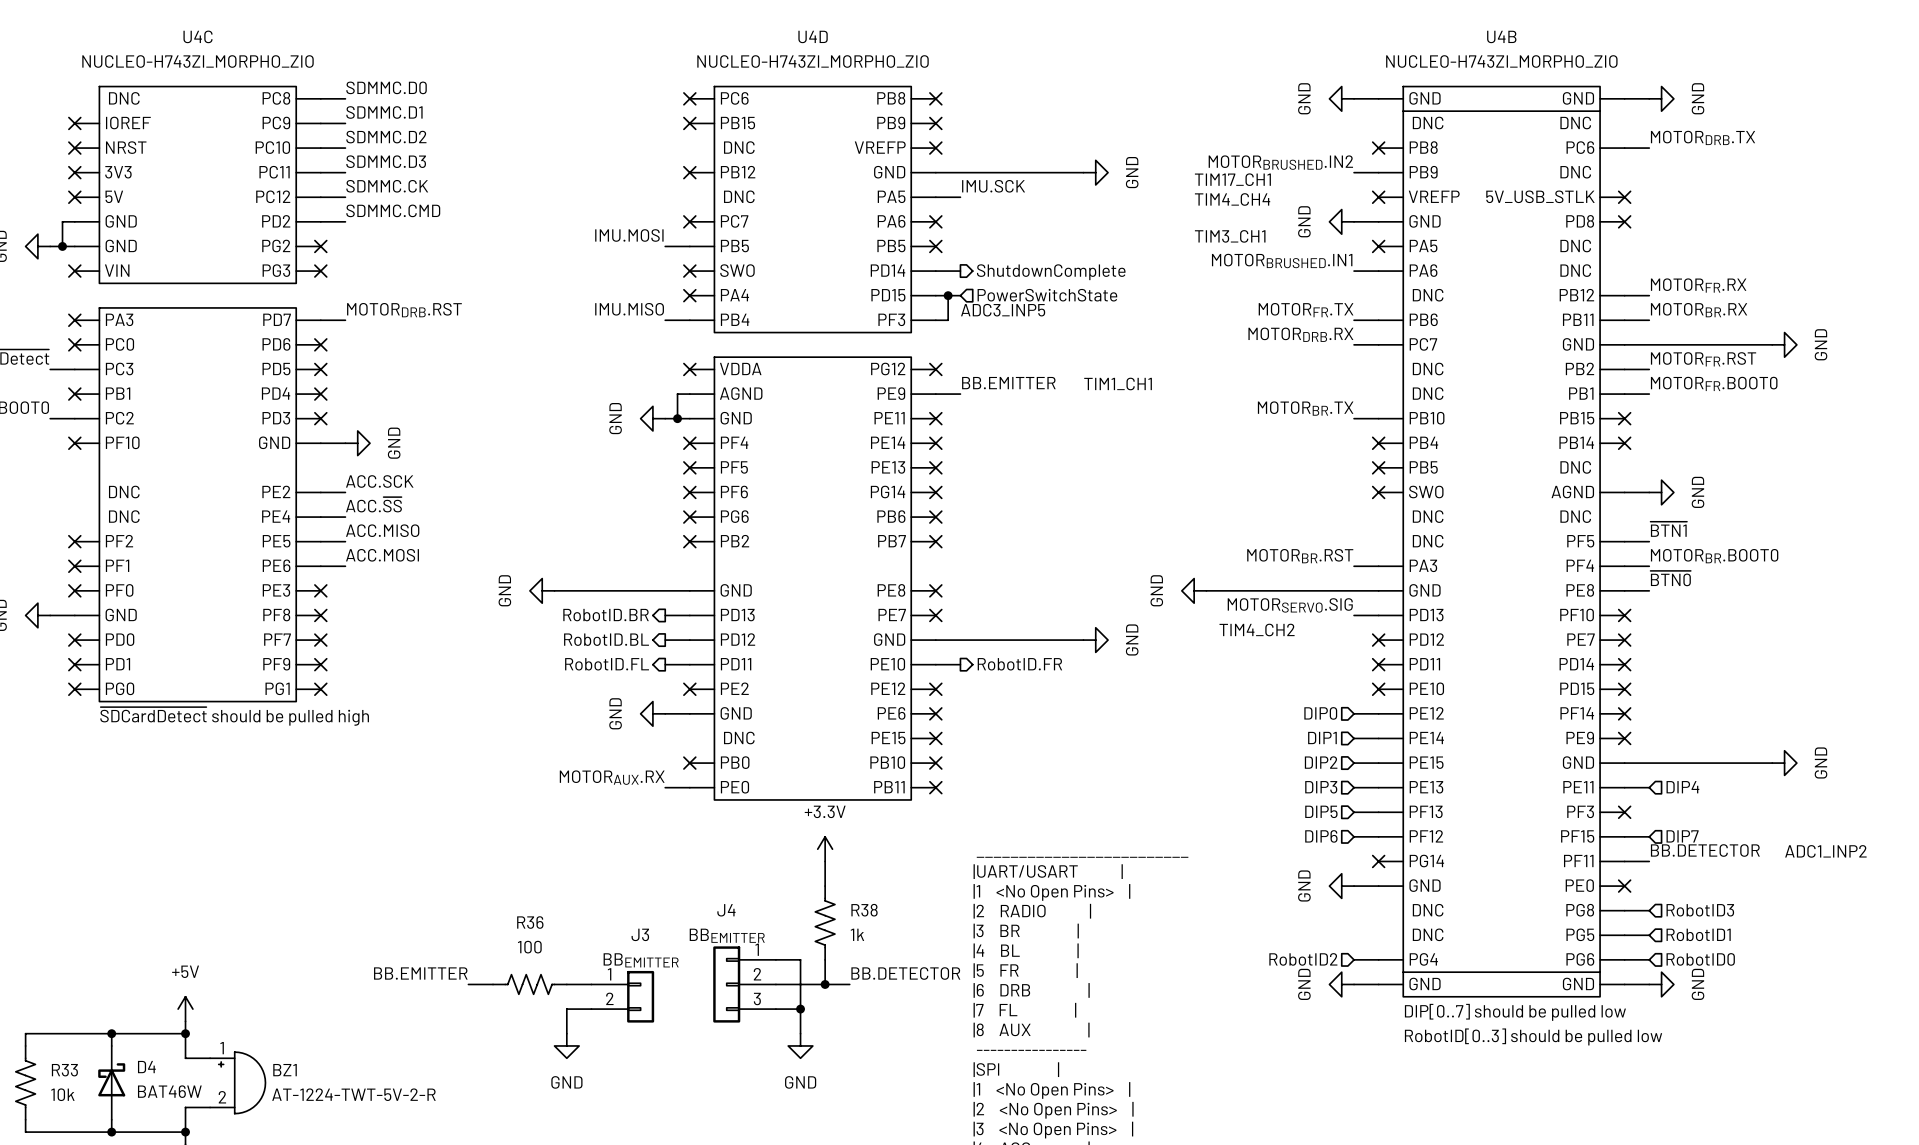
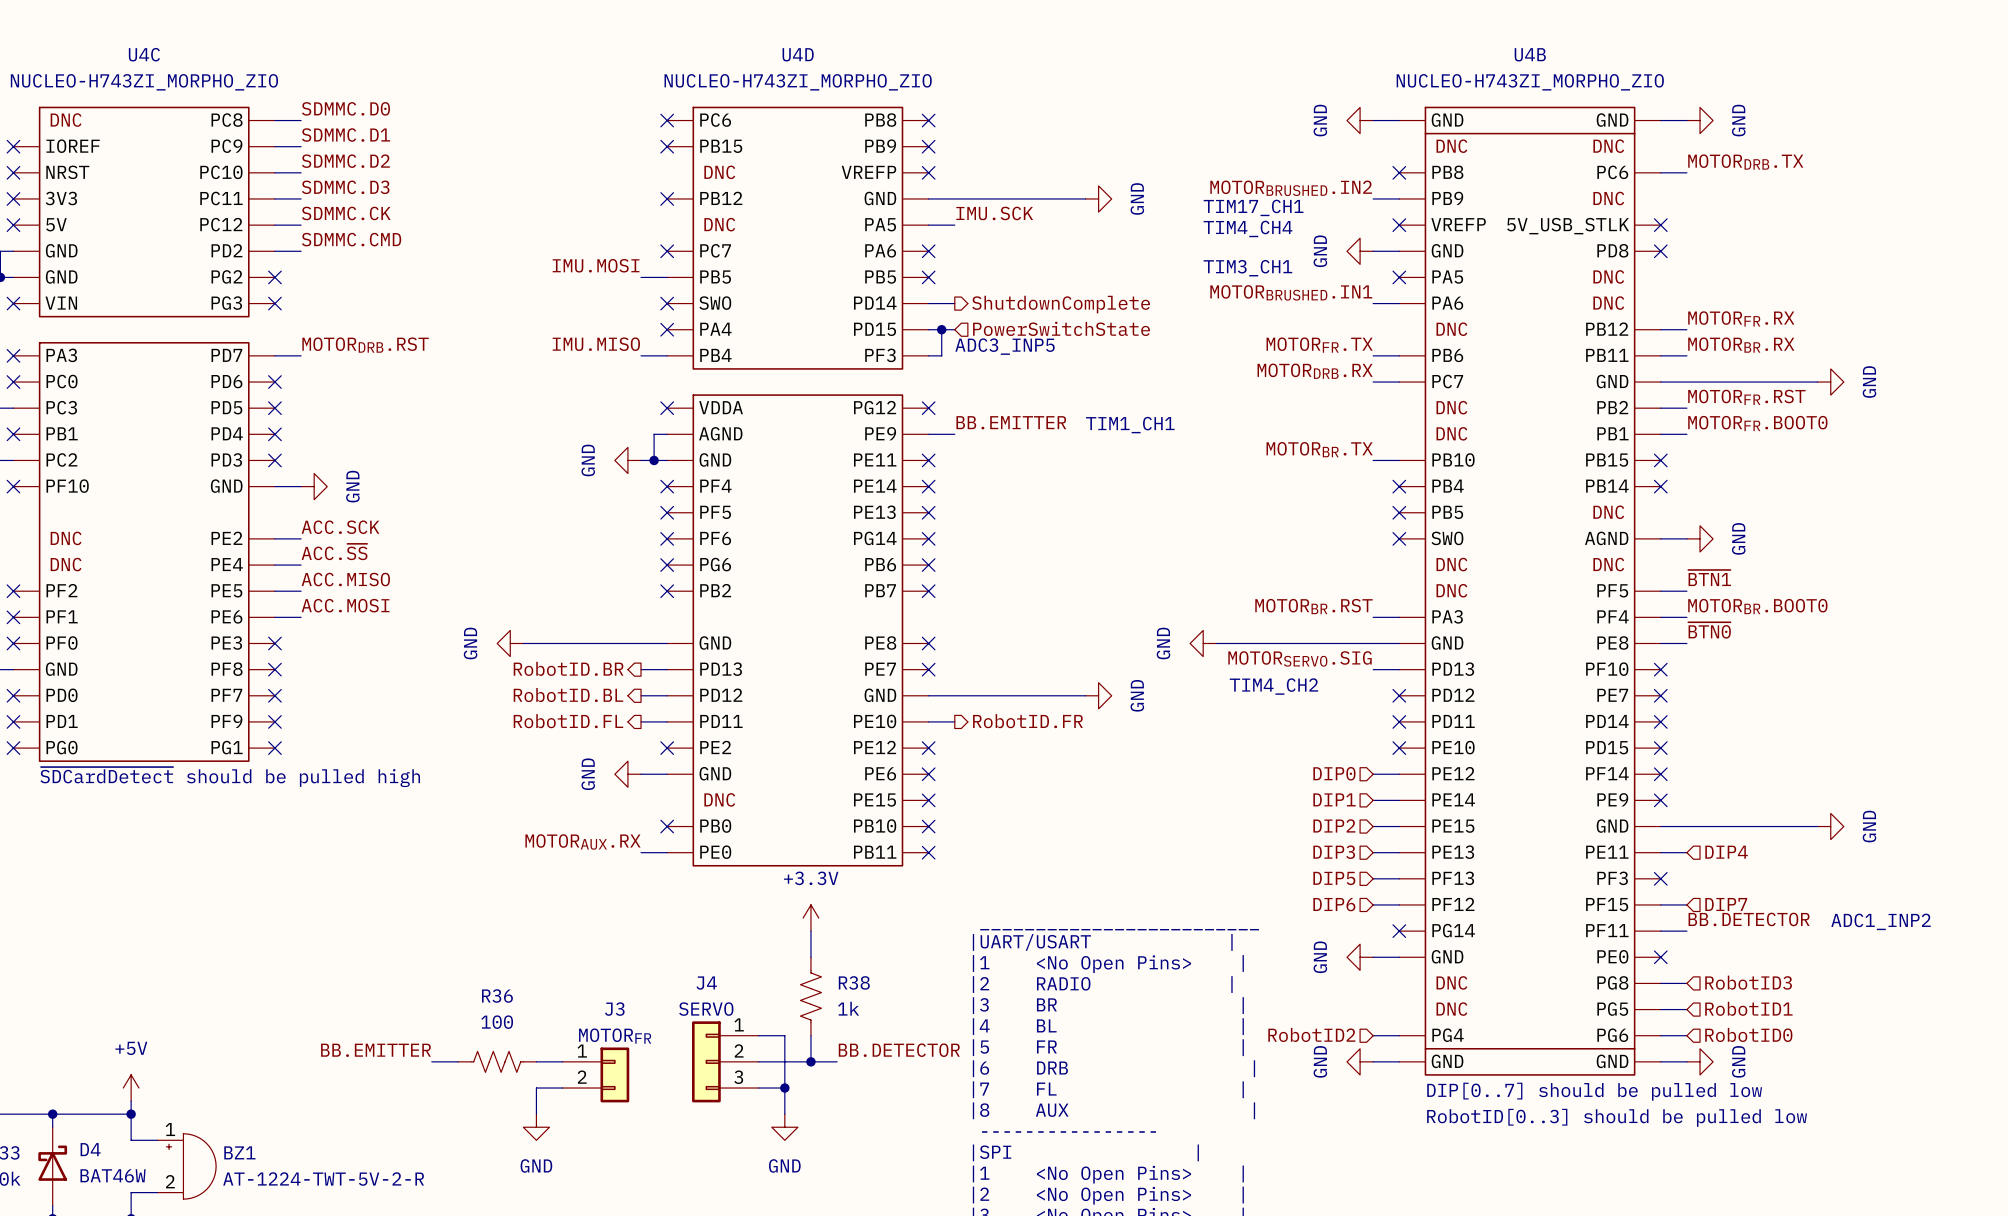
J4 value: BBEMITTER (727, 935) -> SERVO (706, 1009)
J3 value: BBEMITTER (641, 960) -> MOTORFR (615, 1036)

